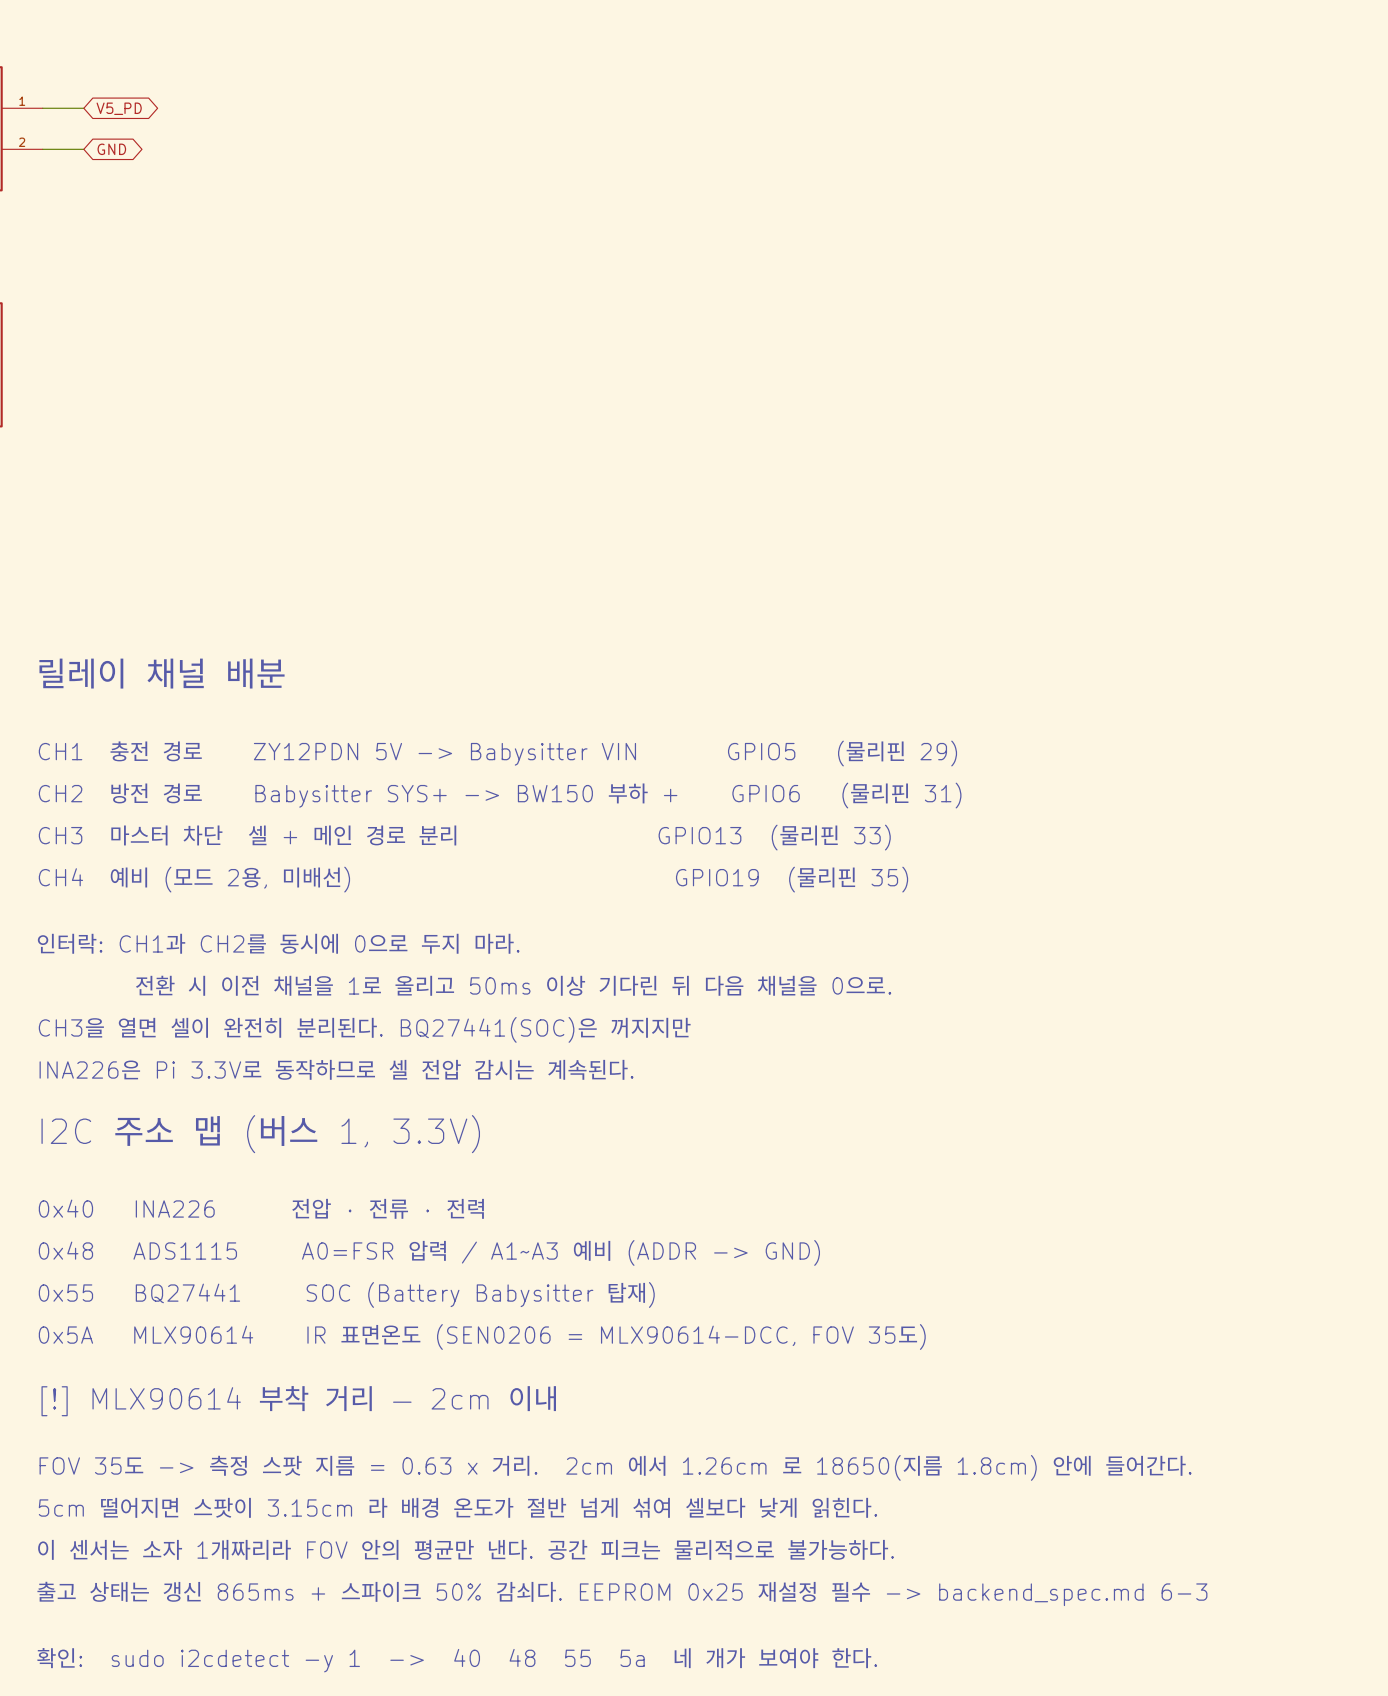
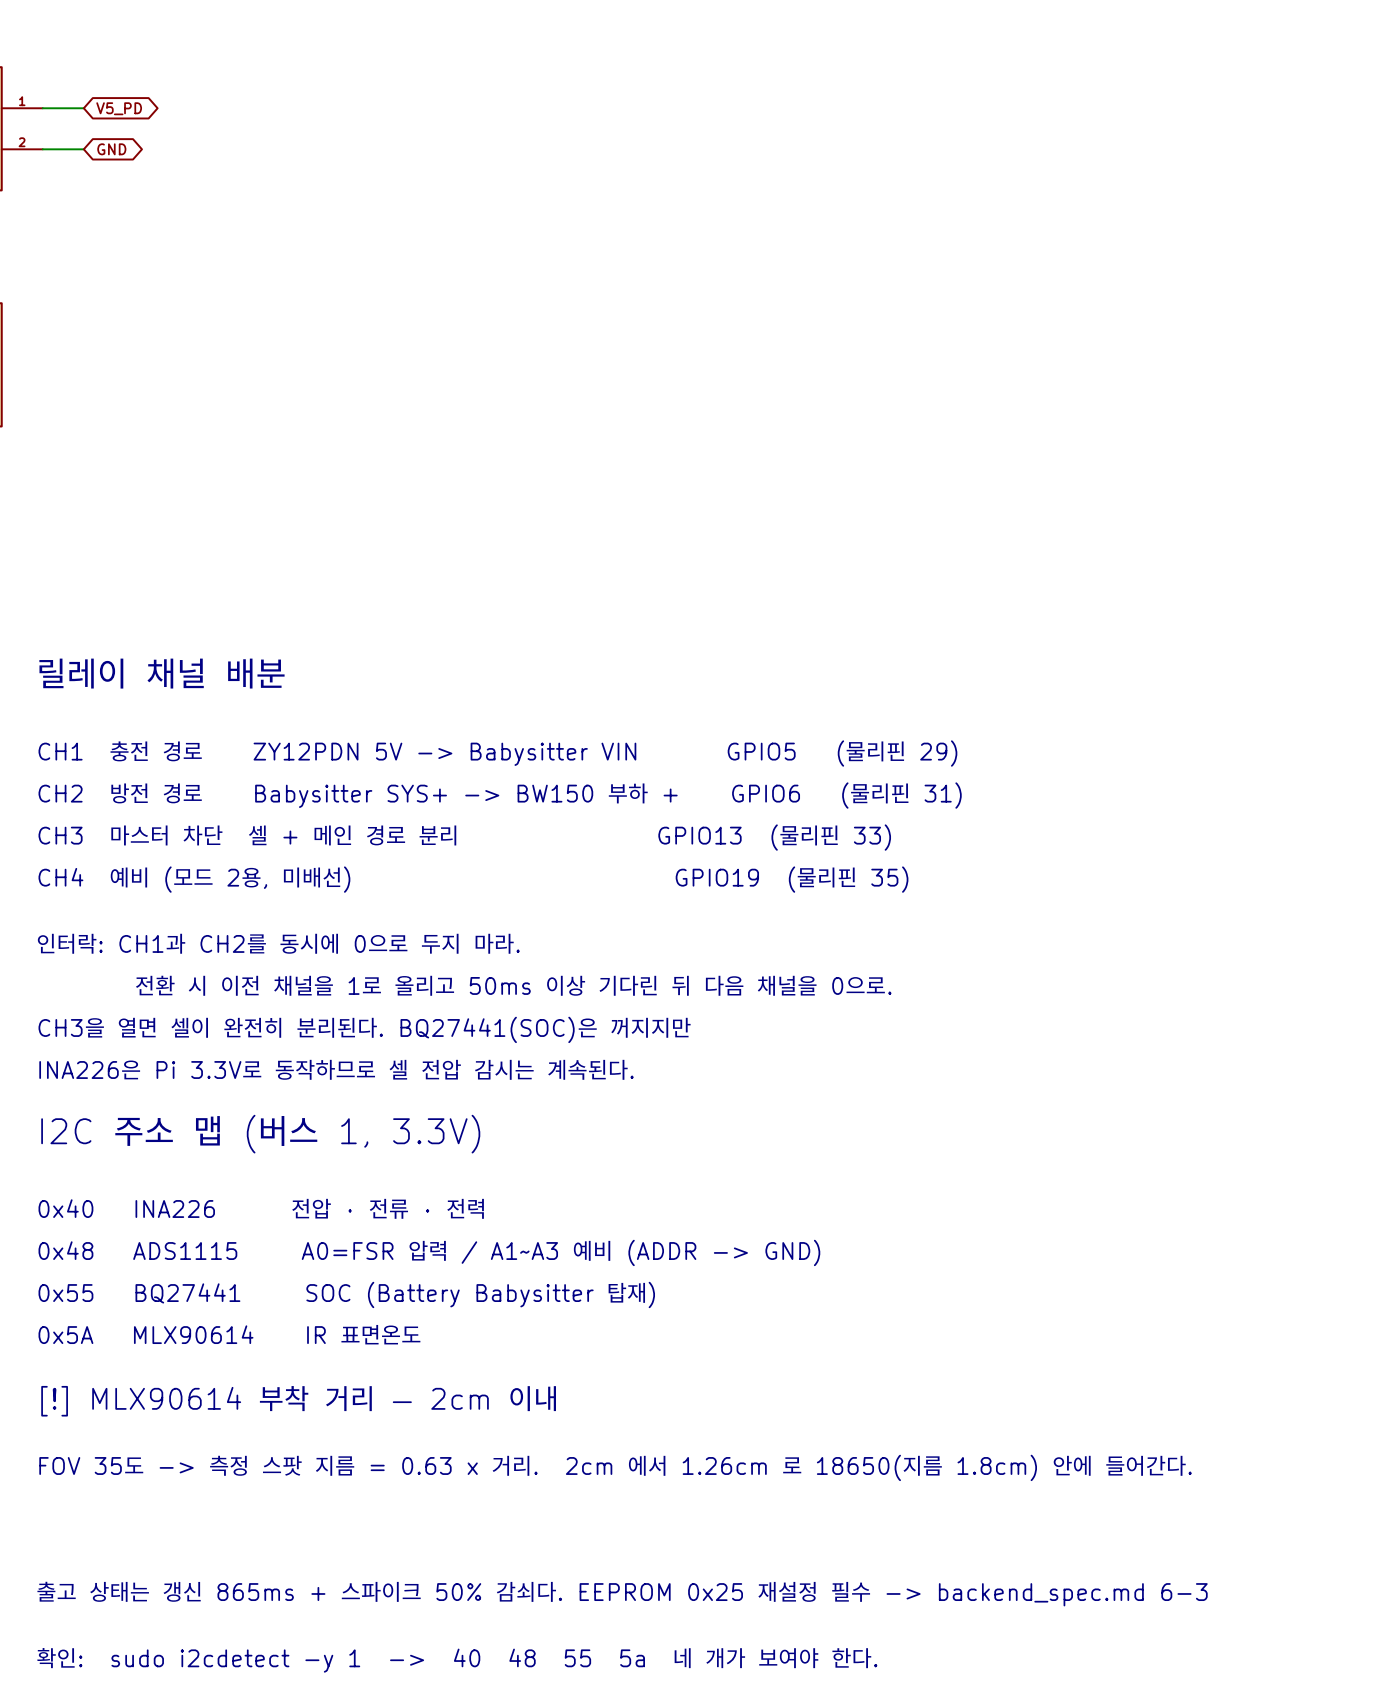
text: 0x5A MLX90614 IR 표면온도 (SEN0206 = MLX90614-DCC, FOV 35도) (482, 1337) -> 0x5A MLX90614 IR 표면온도 (229, 1334)
text: 5cm 떨어지면 스팟이 3.15cm 라 배경 온도가 절반 넘게 섞여 셀보다 낮게 읽힌다. (457, 1507) -> none
text: 이 센서는 소자 1개짜리라 FOV 안의 평균만 낸다. 공간 피크는 물리적으로 불가능하다. (465, 1549) -> none

